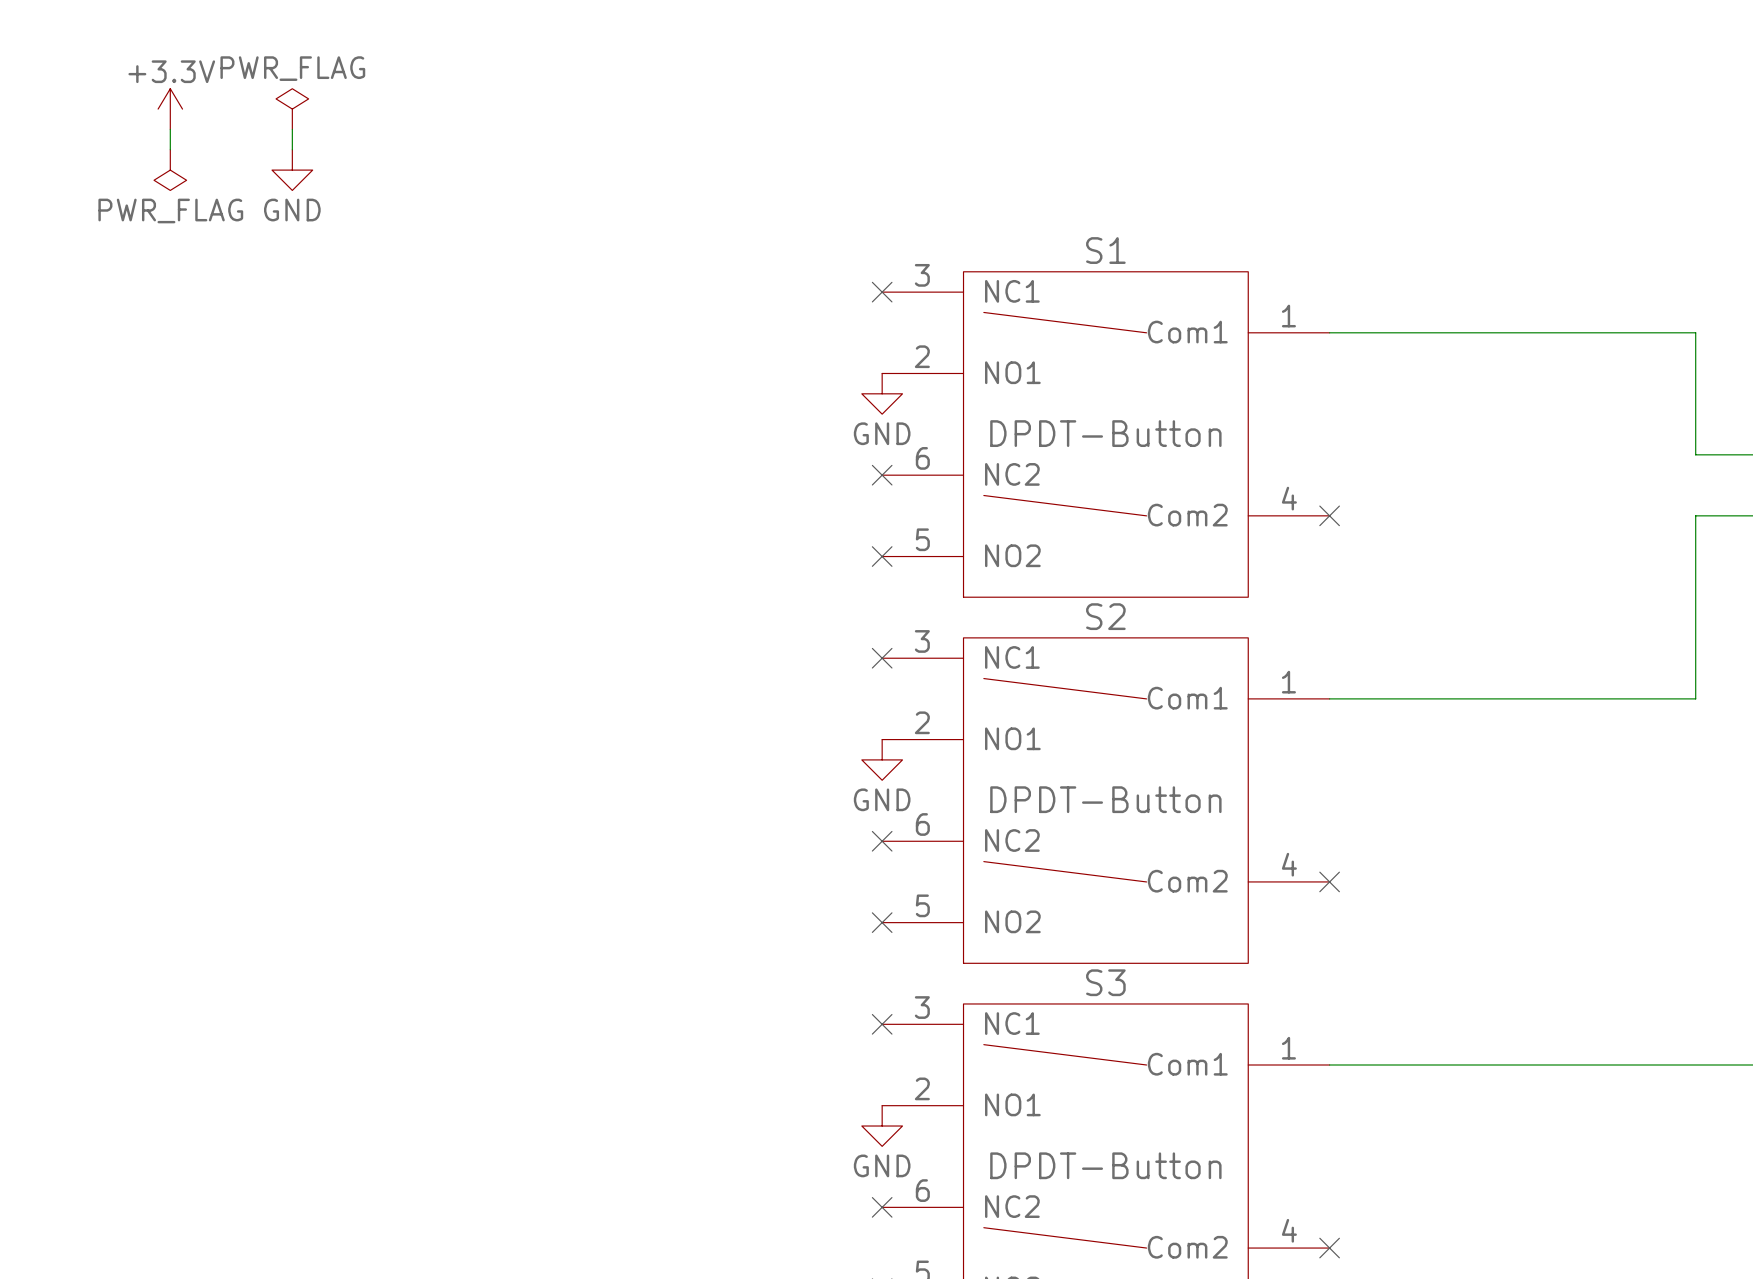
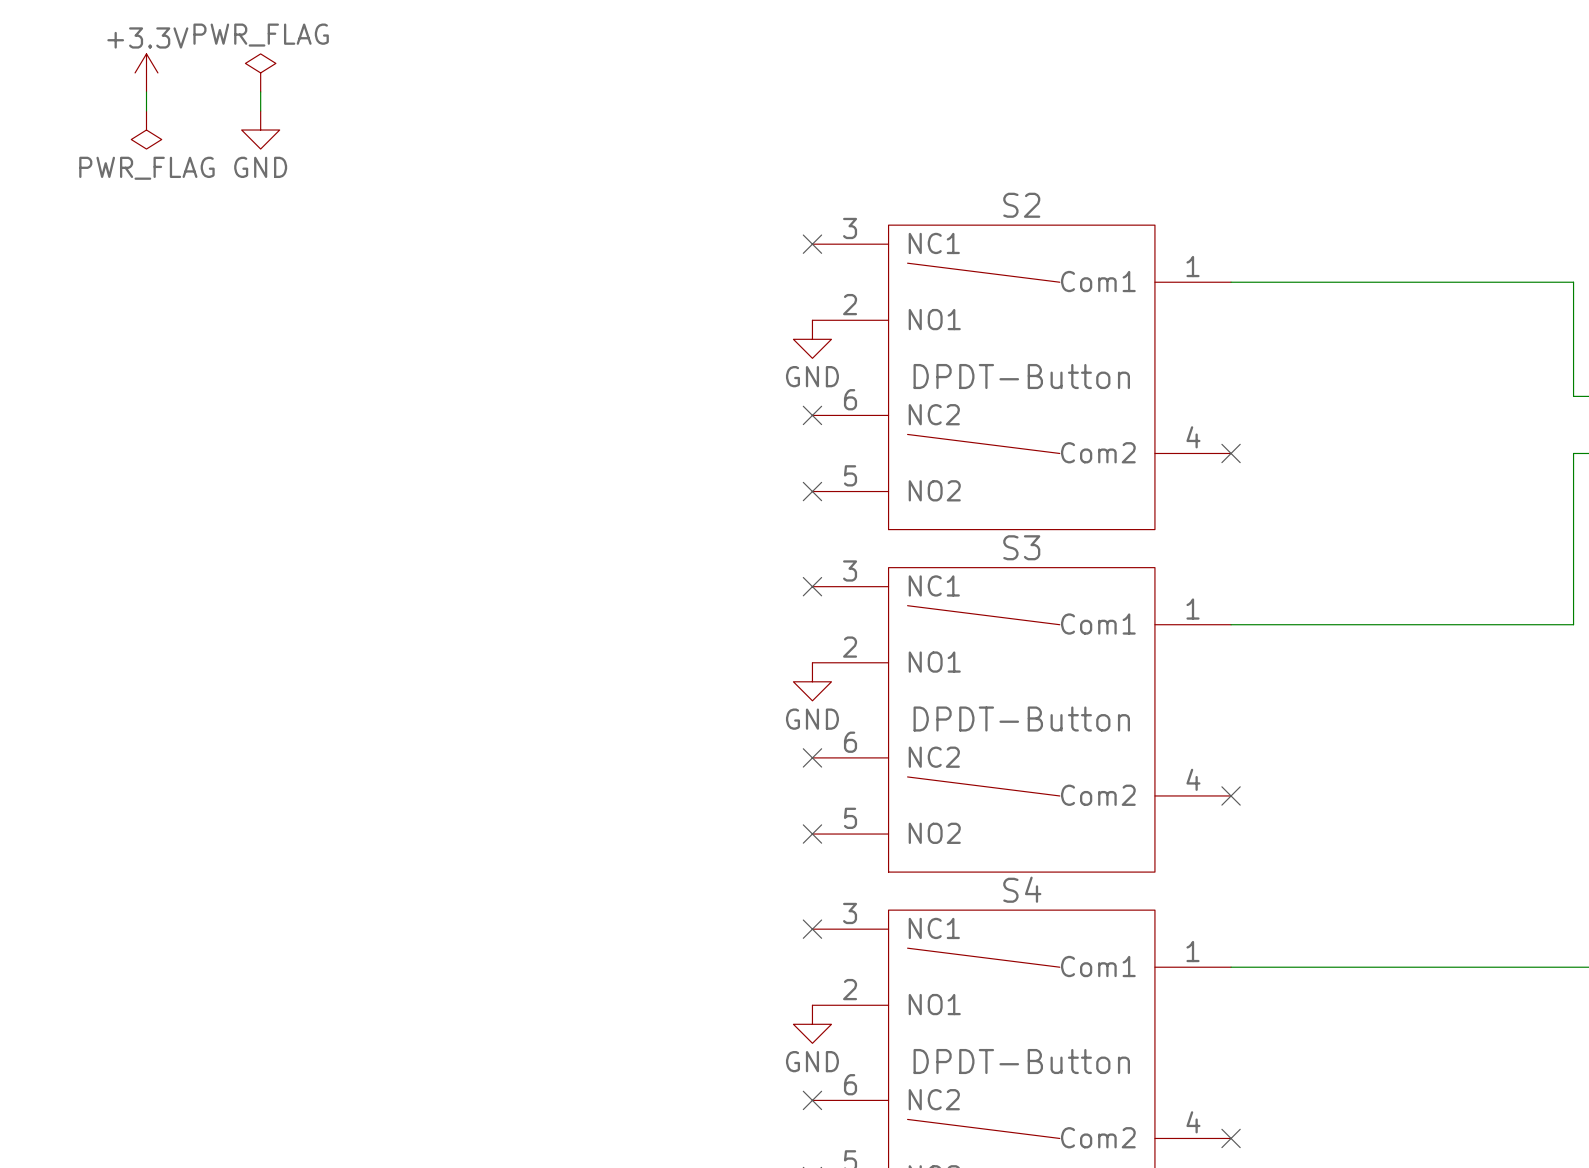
S1 name: S1 (1105, 250) -> S2 (1021, 205)
S2 name: S2 (1105, 616) -> S3 (1021, 547)
S3 name: S3 (1105, 982) -> S4 (1022, 889)

